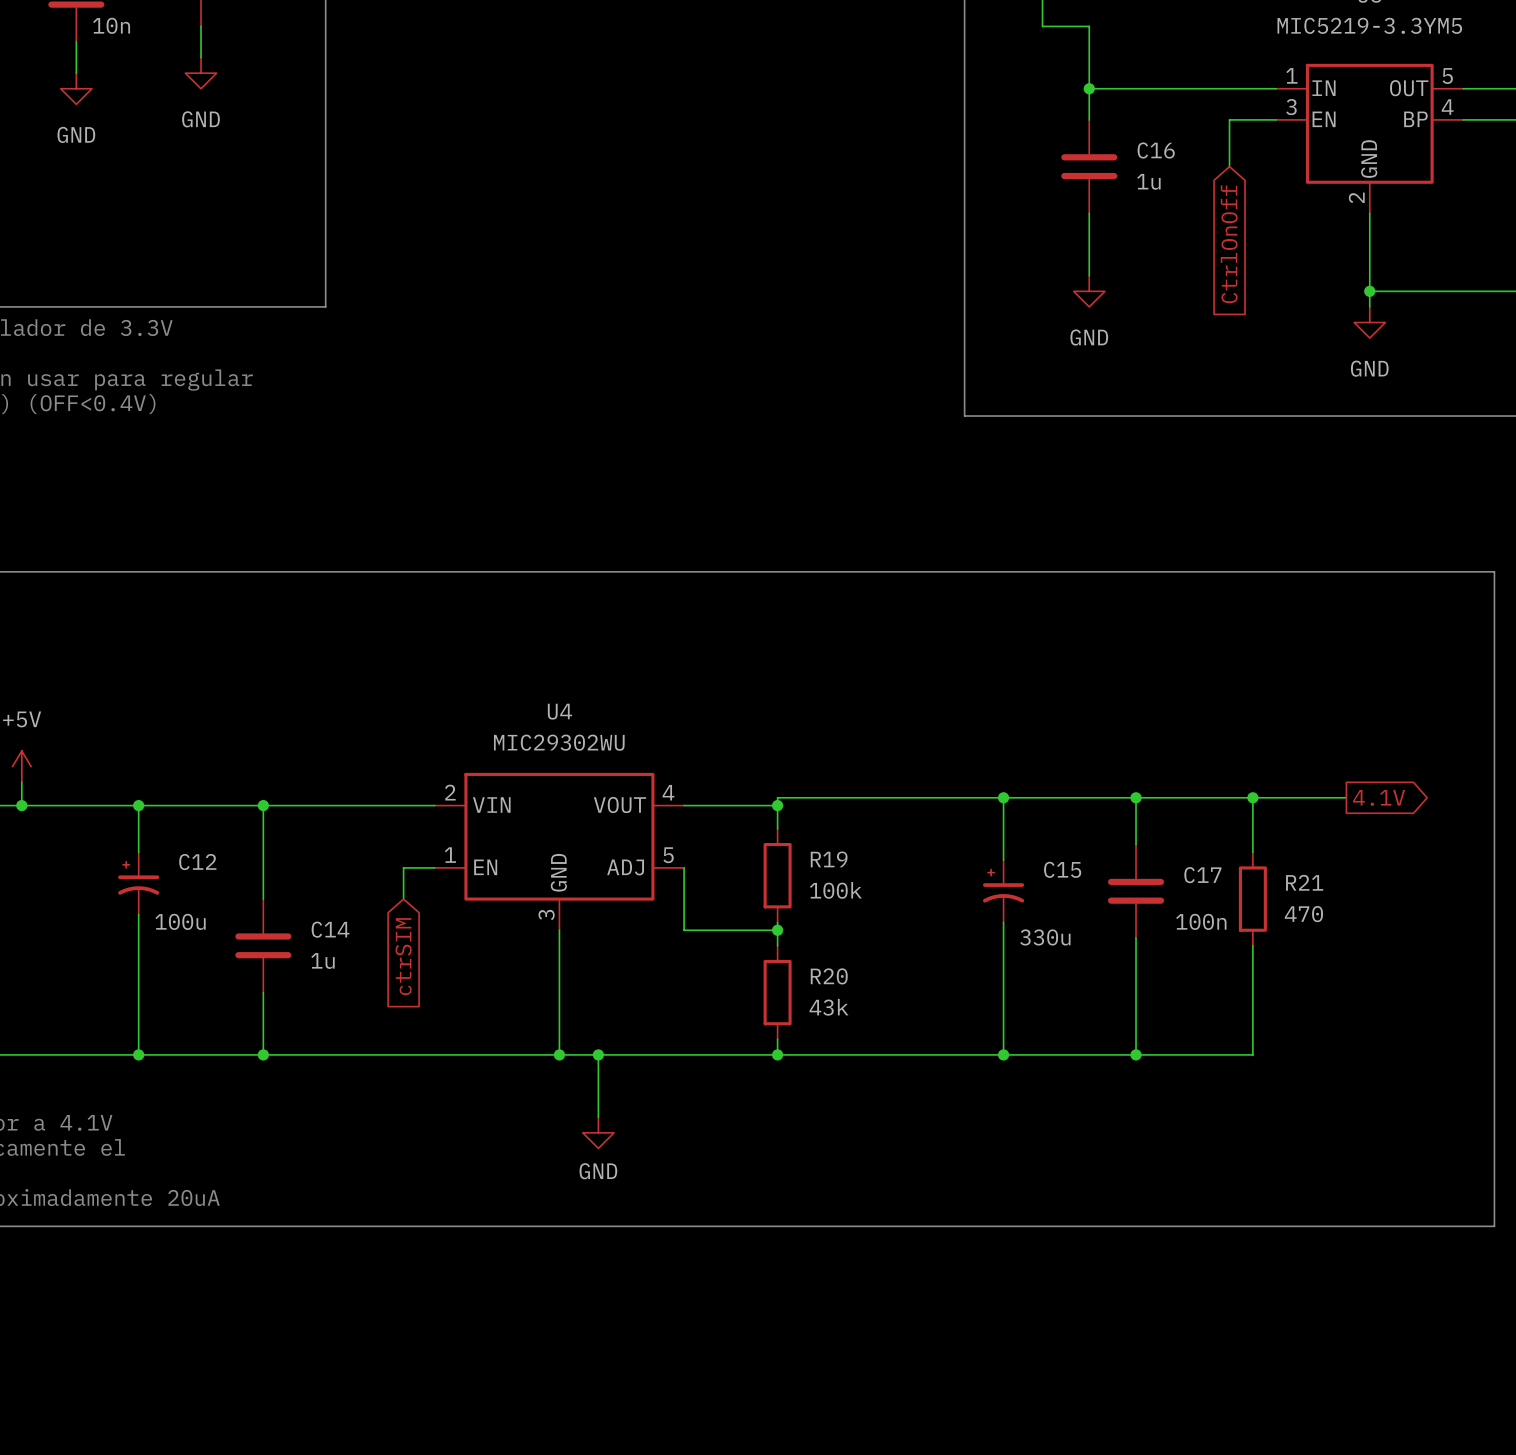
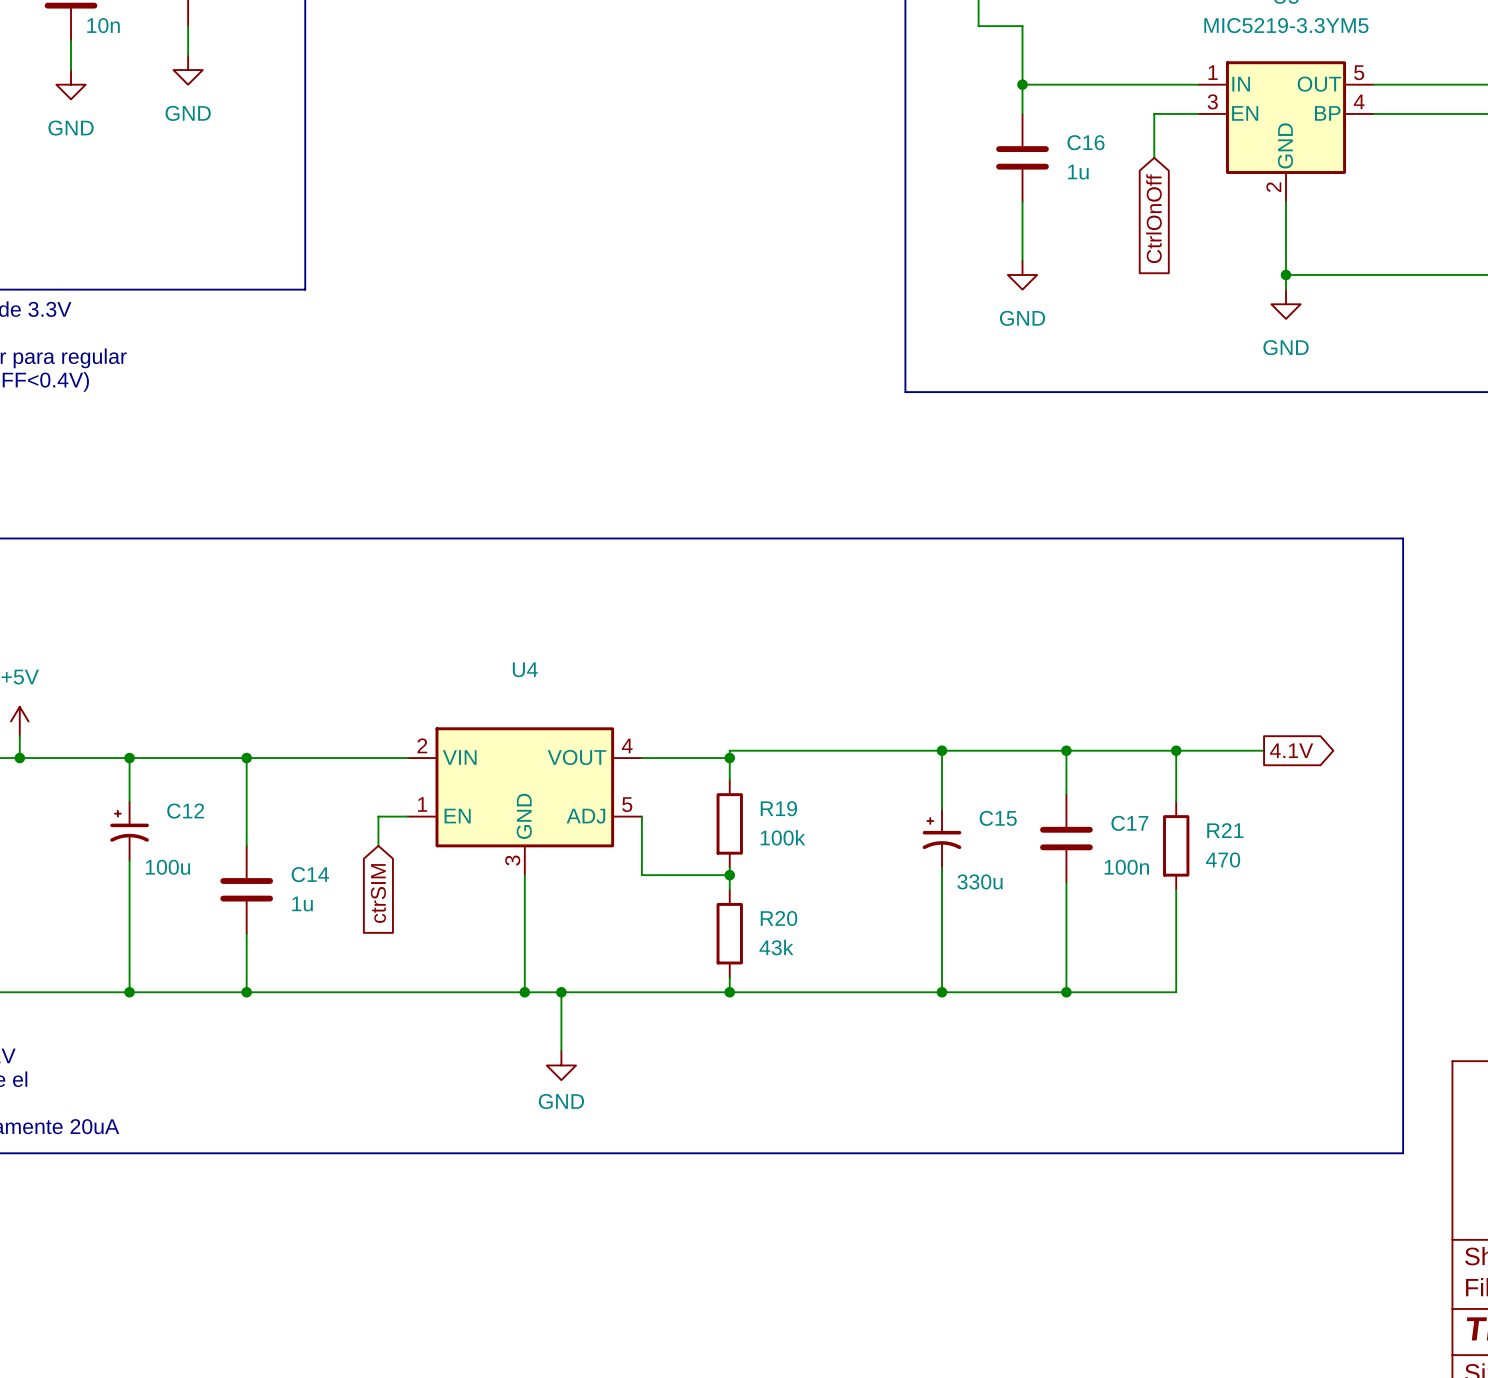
U4 value: MIC29302WU (559, 742) -> none

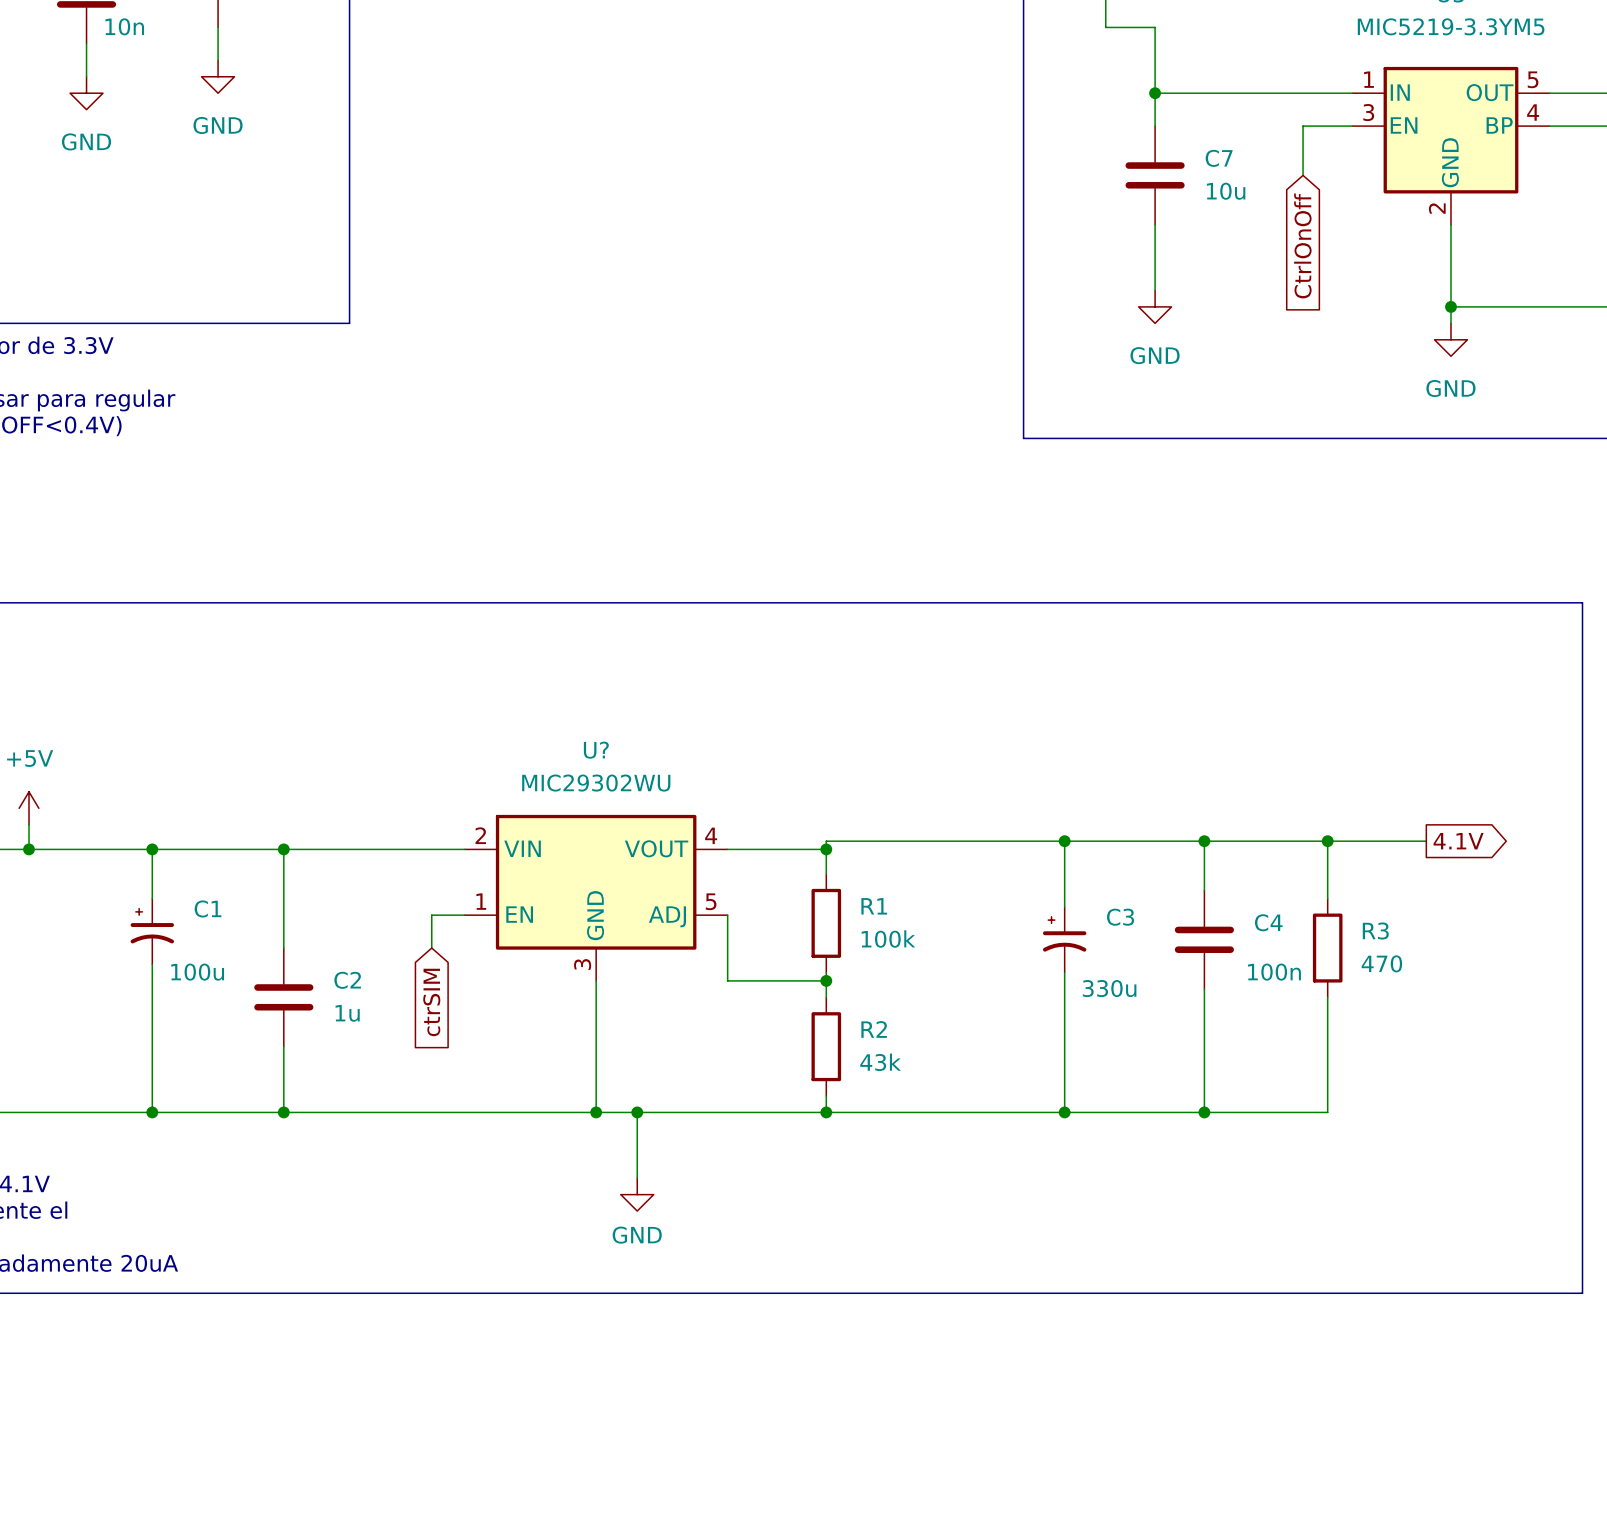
C16 name: C16 (1086, 142) -> C7 (1219, 158)
C16 value: 1u (1078, 172) -> 10u (1226, 191)
U4 name: U4 (525, 669) -> U? (596, 750)
U4 value: none -> MIC29302WU (596, 783)
R19 name: R19 (778, 808) -> R1 (874, 906)
C12 name: C12 (185, 811) -> C1 (208, 908)
C15 name: C15 (998, 818) -> C3 (1120, 917)
C17 name: C17 (1129, 823) -> C4 (1268, 922)
R21 name: R21 (1225, 830) -> R3 (1375, 931)
C14 name: C14 (310, 874) -> C2 (347, 980)
R20 name: R20 (778, 918) -> R2 (874, 1029)

